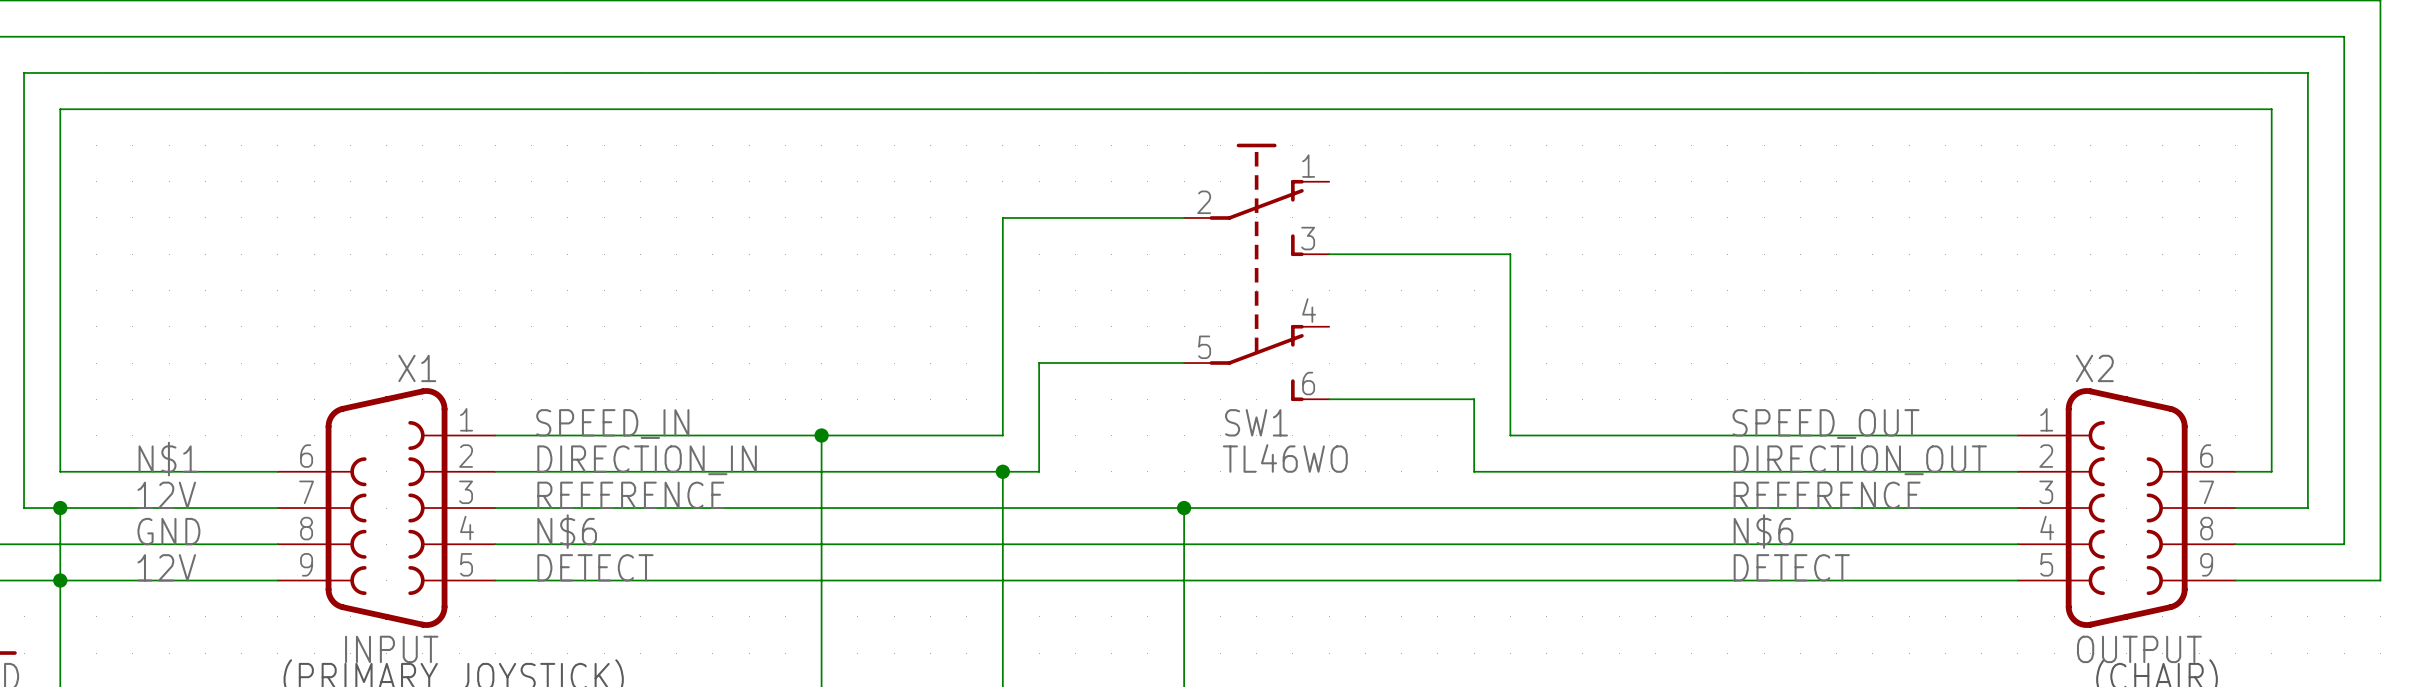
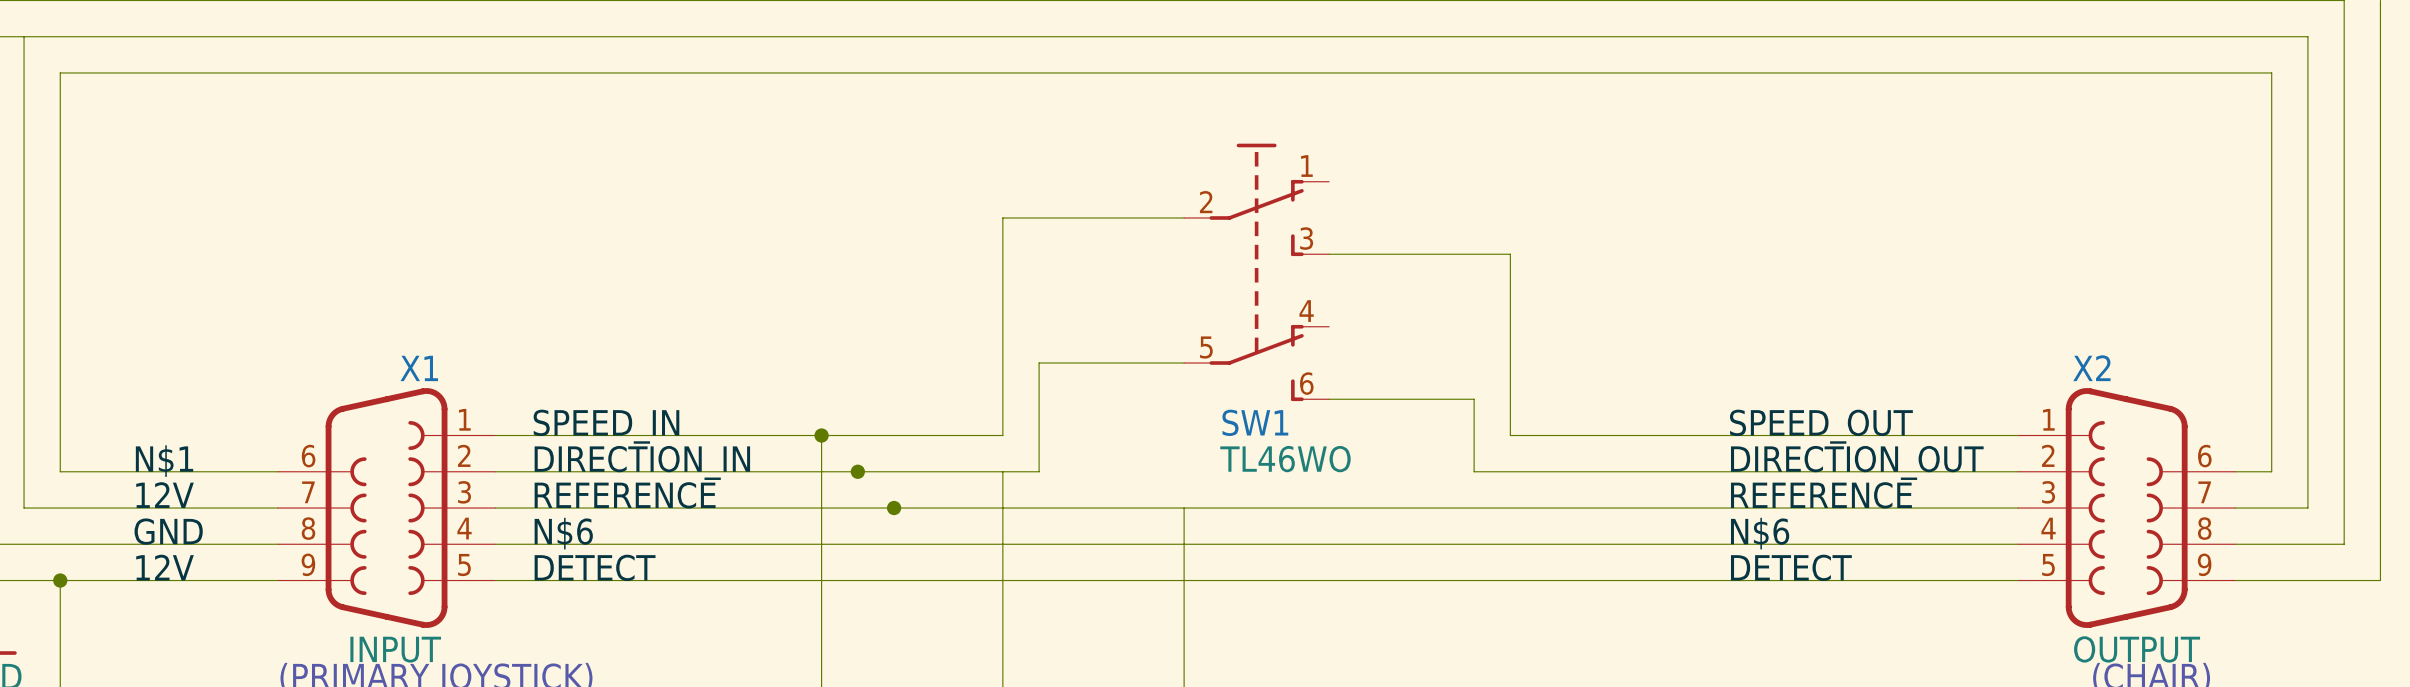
wire: (2344, 0) (2380, 0) -> (2344, 0) (2344, 36)
wire: (2307, 36) (2344, 36) -> none
wire: (24, 72) (60, 72) -> (24, 72) (24, 36)
wire: (2271, 72) (2307, 72) -> (2307, 36) (2307, 72)
wire: none -> (2271, 72) (2271, 109)
wire: (60, 109) (2271, 109) -> (60, 109) (60, 72)
junction: none -> (857, 471)
junction: (1002, 471) -> none
wire: (60, 508) (60, 580) -> none
junction: (60, 508) -> none
junction: none -> (894, 508)
junction: (1184, 508) -> none

